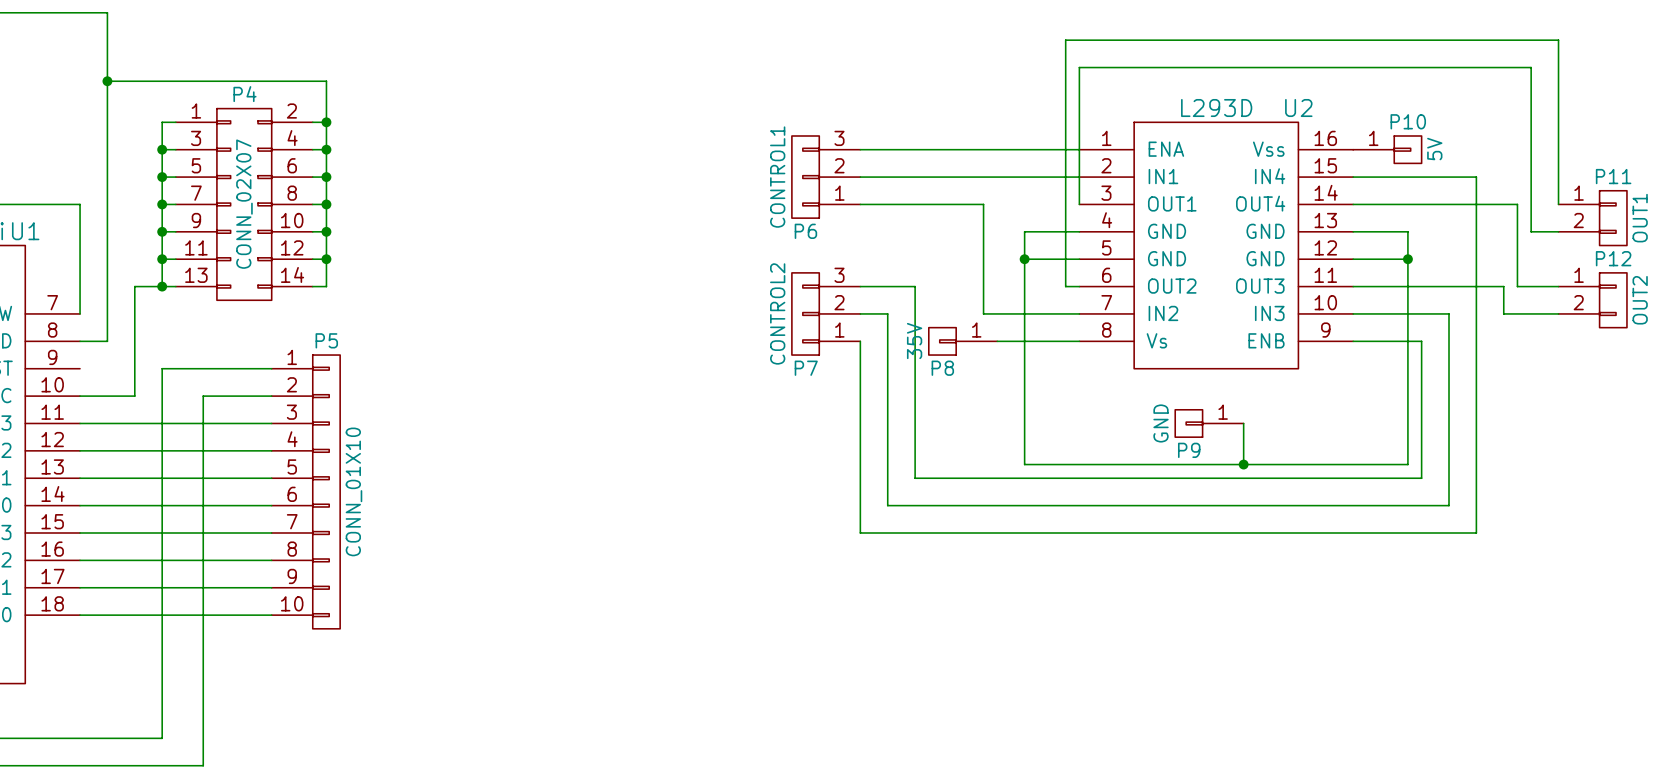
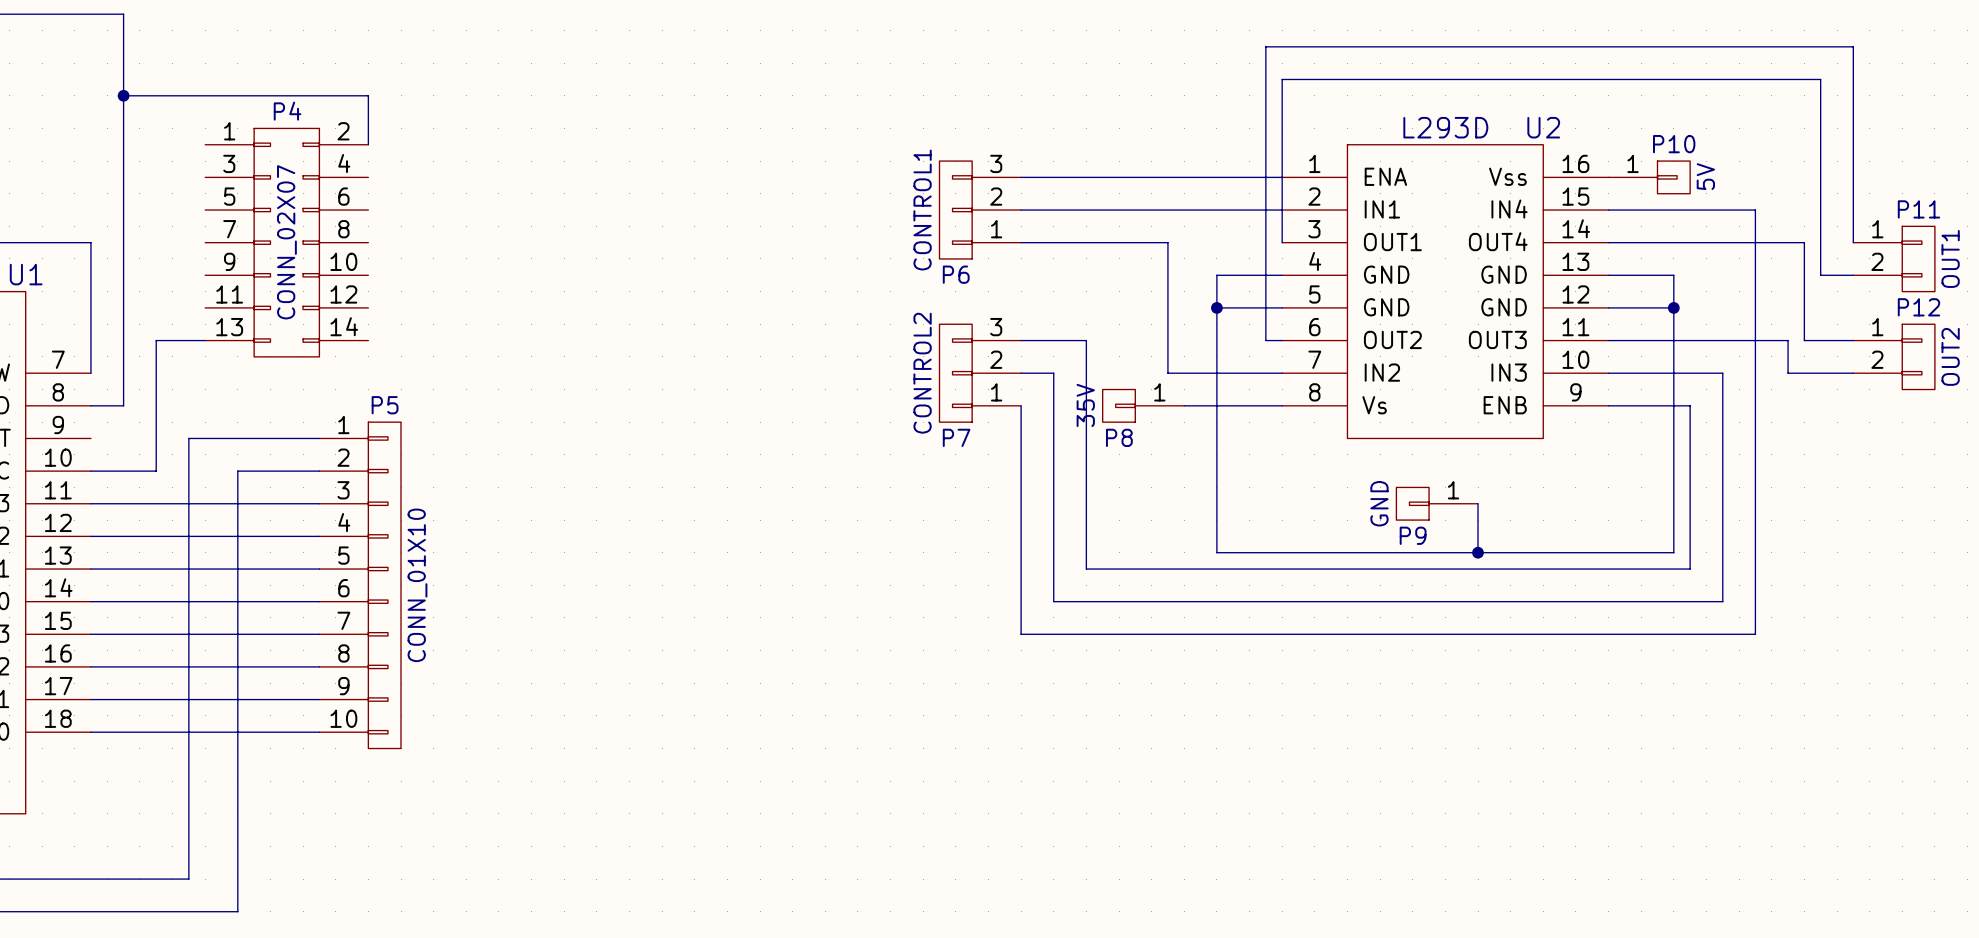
wire: (312, 81) (326, 81) (326, 286) (312, 286) -> none
wire: (175, 122) (162, 122) (162, 286) -> none
wire: (312, 122) (326, 122) -> (368, 144) (368, 95)
junction: (326, 122) -> none
wire: (162, 149) (175, 149) -> none
junction: (162, 149) -> none
wire: (312, 149) (326, 149) -> none
junction: (326, 149) -> none
wire: (162, 177) (175, 177) -> none
junction: (162, 177) -> none
wire: (312, 177) (326, 177) -> none
junction: (326, 177) -> none
wire: (162, 204) (175, 204) -> none
junction: (162, 204) -> none
wire: (312, 204) (326, 204) -> none
junction: (326, 204) -> none
wire: (162, 231) (175, 231) -> none
junction: (162, 231) -> none
wire: (312, 231) (326, 231) -> none
junction: (326, 231) -> none
wire: (162, 259) (175, 259) -> none
junction: (162, 259) -> none
wire: (312, 259) (326, 259) -> none
junction: (326, 259) -> none
junction: (162, 286) -> none

